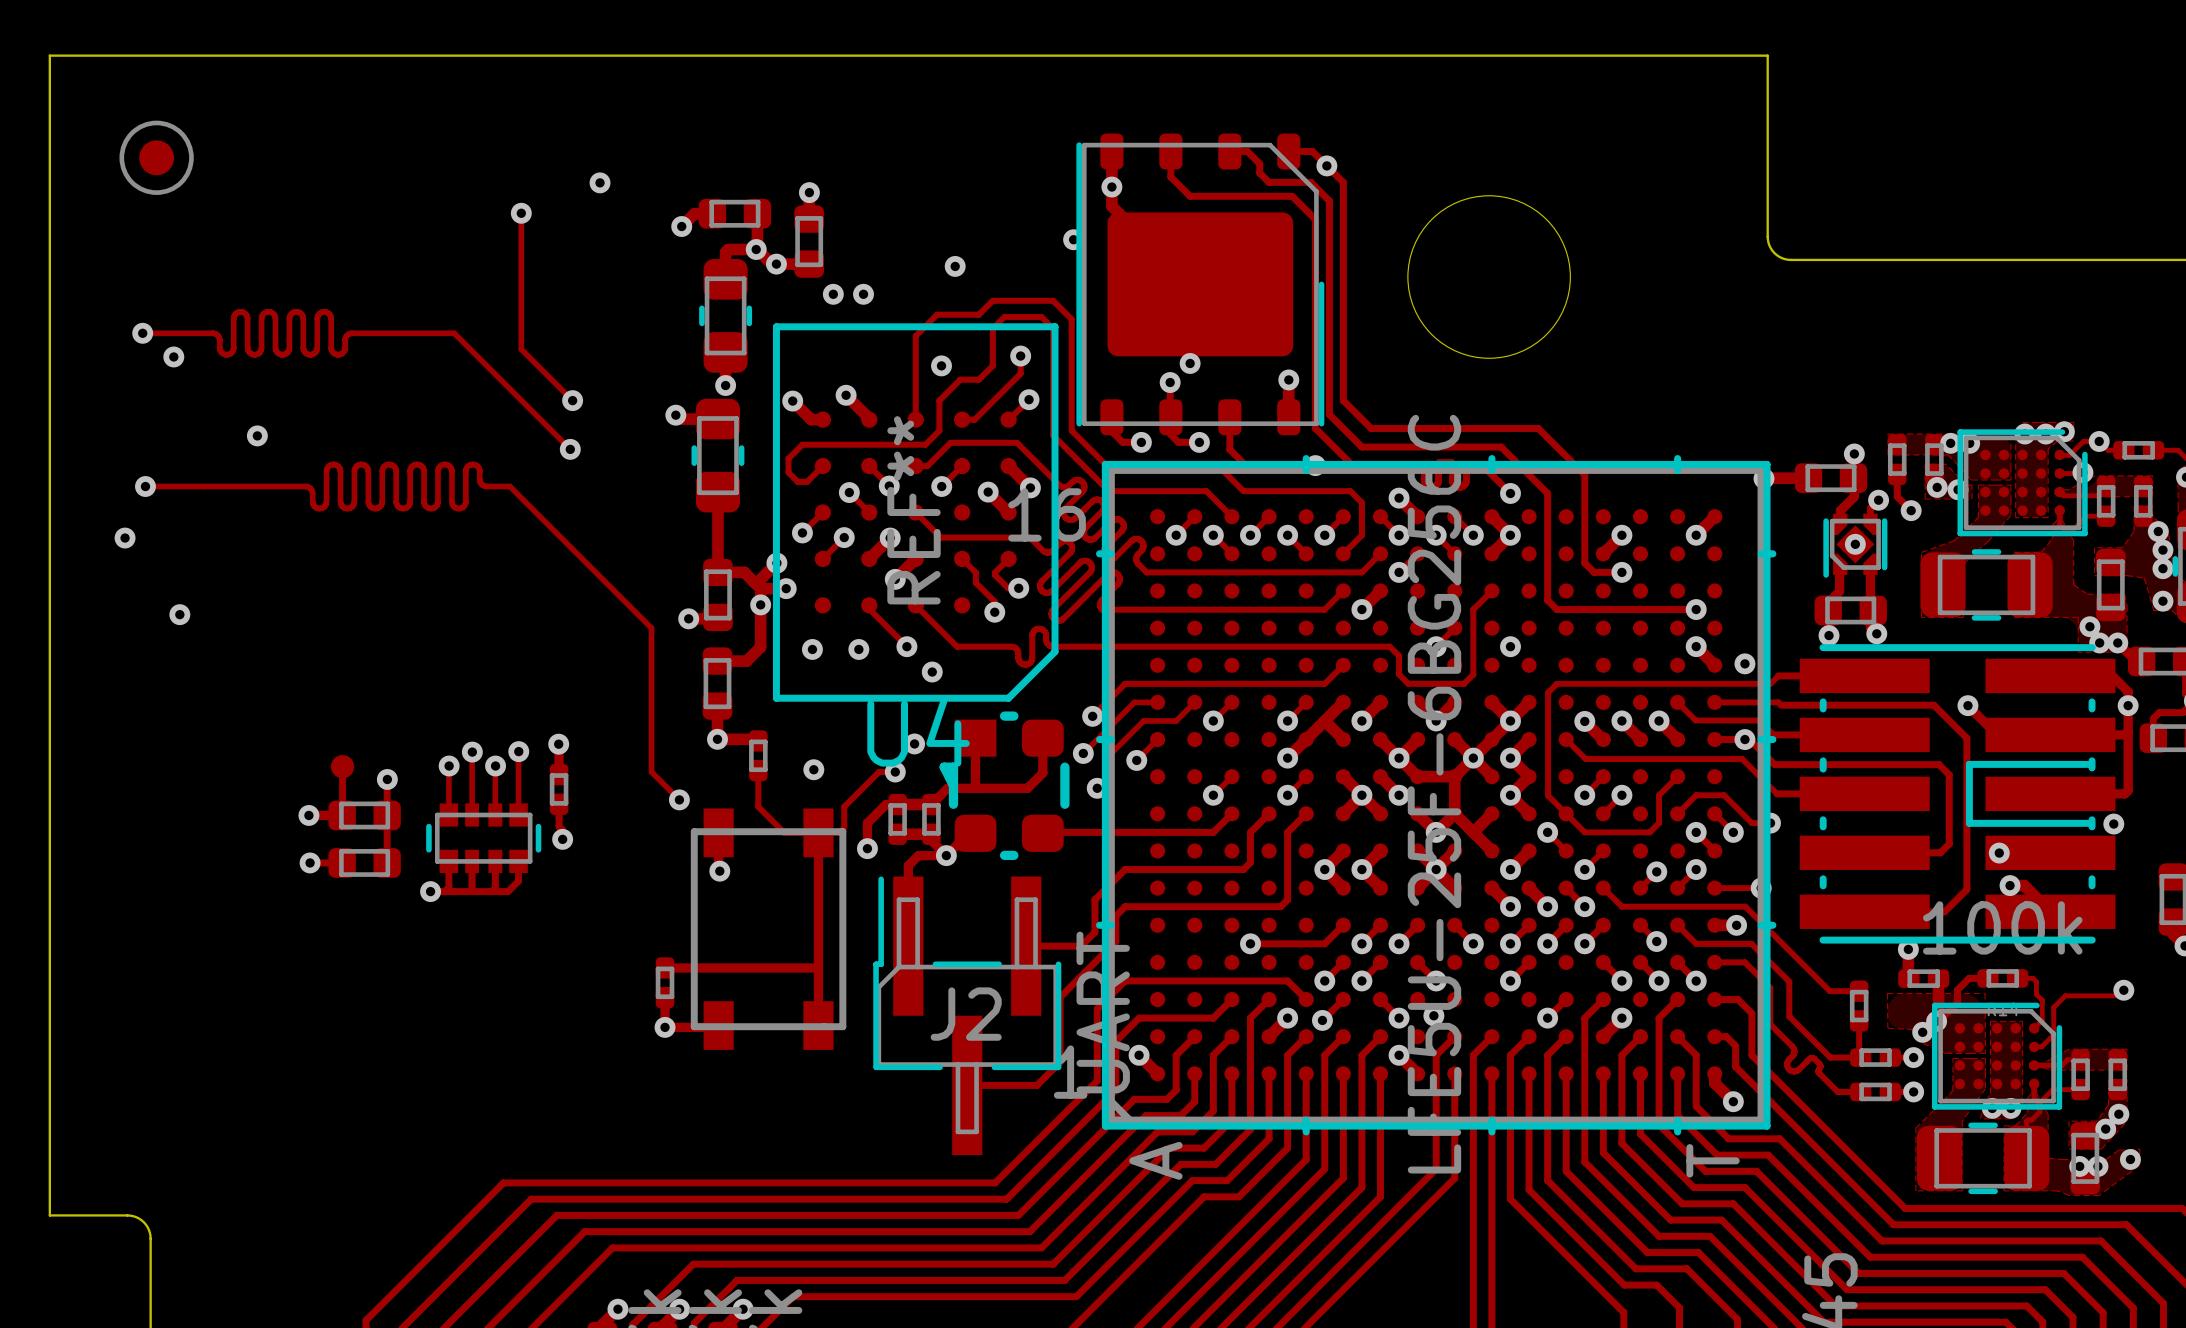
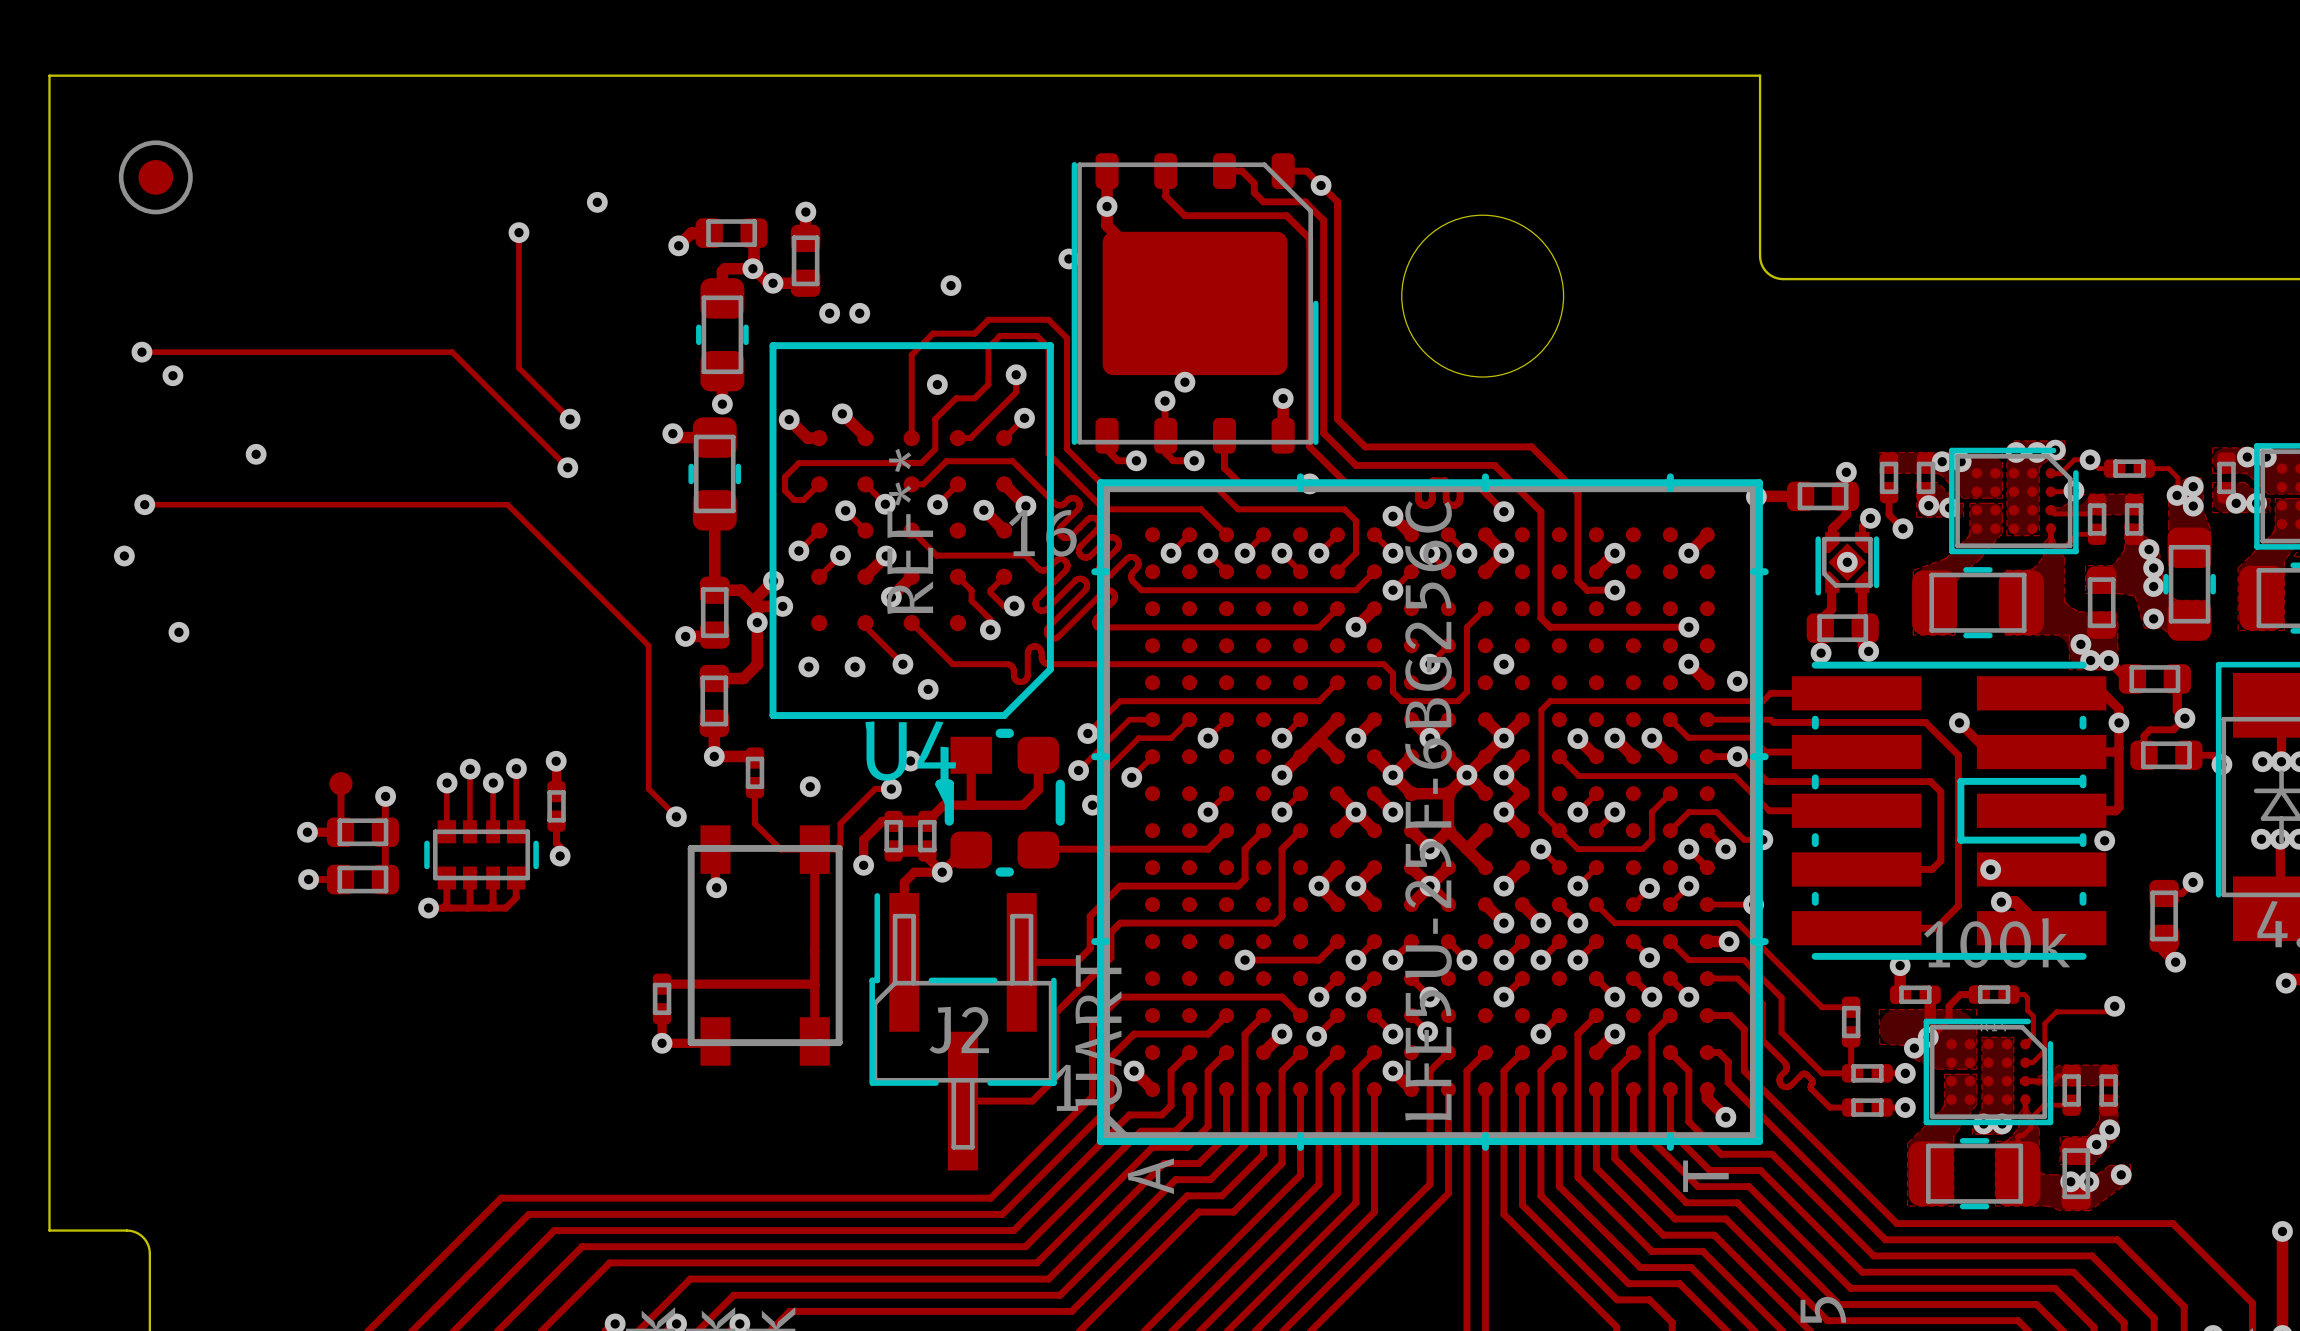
track: (212, 333) (219, 337) (221, 352) (226, 354) (231, 353) (233, 349) (233, 317) (239, 312) (243, 312) (247, 317) (247, 349) (253, 354) (257, 354) (261, 349) (261, 317) (266, 312) (271, 312) (275, 317) (275, 349) (280, 354) (285, 354) (289, 349) (289, 317) (294, 312) (299, 312) (303, 317) (303, 347) (307, 354) (313, 354) (317, 349) (317, 318) (321, 312) (327, 312) (331, 317) (331, 347) (333, 353) (338, 354) (343, 352) (345, 337) (352, 333) -> (211, 352) (350, 352)
track: (305, 486) (311, 490) (314, 505) (319, 508) (323, 507) (326, 503) (326, 469) (331, 464) (336, 465) (340, 469) (340, 503) (345, 508) (350, 507) (354, 503) (354, 469) (359, 464) (364, 465) (368, 469) (368, 503) (373, 508) (378, 507) (382, 503) (382, 469) (387, 464) (392, 465) (396, 469) (396, 503) (401, 508) (406, 507) (409, 503) (410, 469) (415, 464) (420, 465) (423, 469) (424, 503) (429, 508) (434, 507) (437, 503) (437, 471) (441, 465) (447, 465) (451, 469) (451, 501) (455, 507) (461, 507) (465, 503) (465, 471) (468, 465) (474, 464) (478, 467) (480, 482) (486, 486) -> (304, 504) (484, 504)

